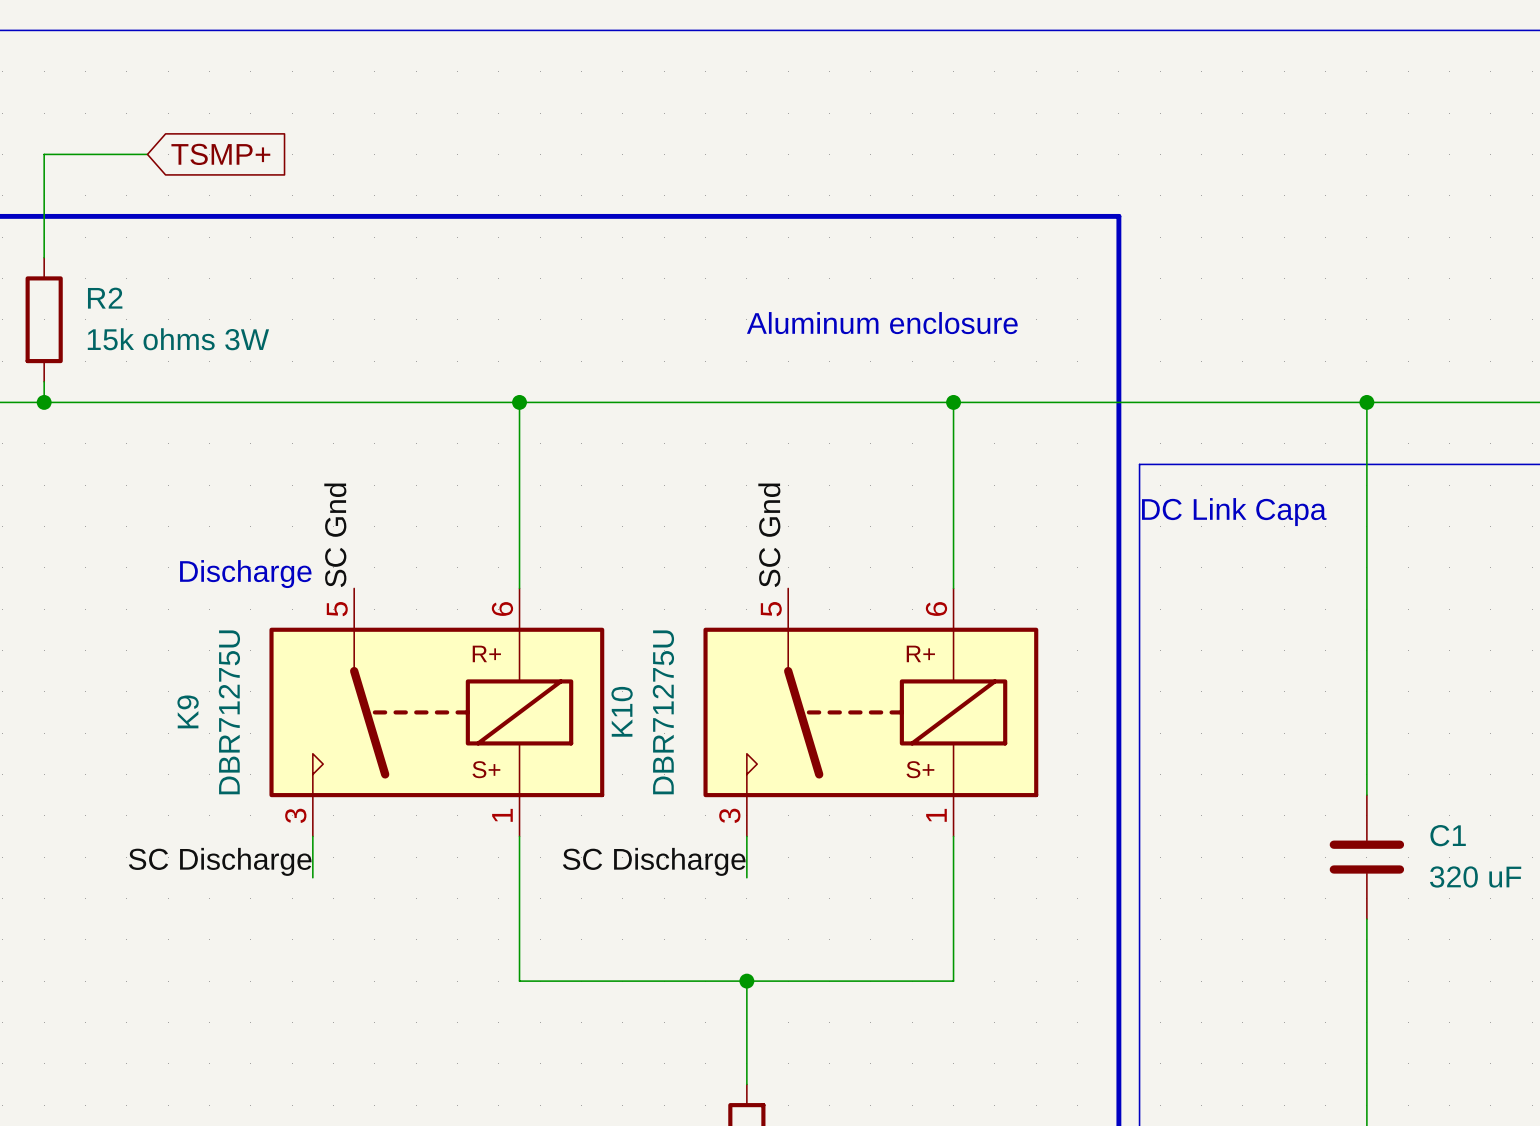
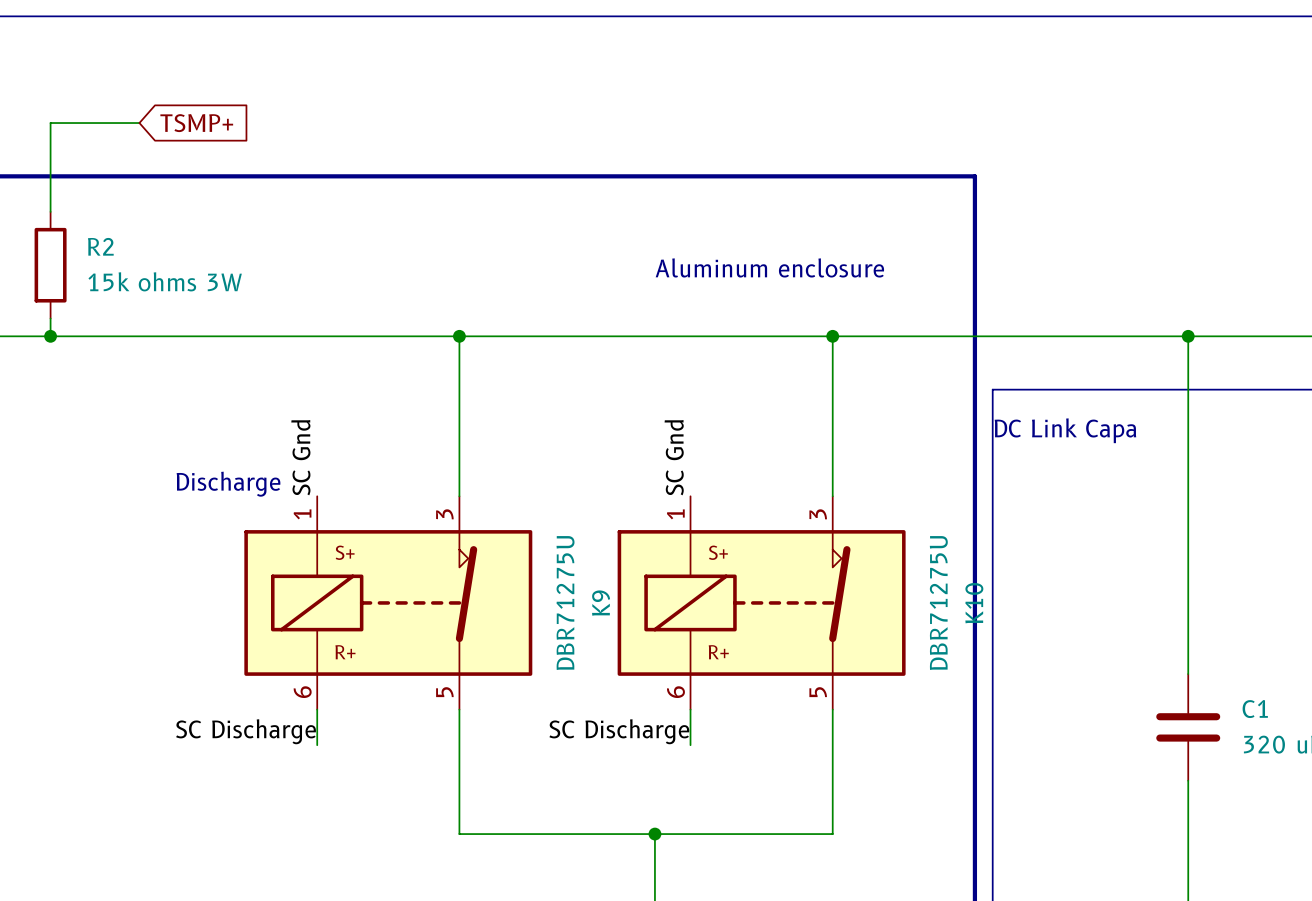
K9 symbol: [269, 588, 605, 837] -> [244, 496, 533, 710]
K10 symbol: [703, 588, 1039, 837] -> [617, 496, 906, 710]
K9 name position: K9 (188, 711) -> K9 (601, 603)
K10 name position: K10 (622, 711) -> K10 (974, 603)
K9 value position: DBR71275U (229, 712) -> DBR71275U (565, 603)
K10 value position: DBR71275U (663, 712) -> DBR71275U (938, 603)
wire: (312, 836) (312, 877) -> (317, 709) (317, 745)
wire: (746, 836) (746, 877) -> (690, 709) (690, 745)
label position: SC Discharge (220, 861) -> SC Discharge (246, 731)
label position: SC Discharge (654, 861) -> SC Discharge (619, 731)

